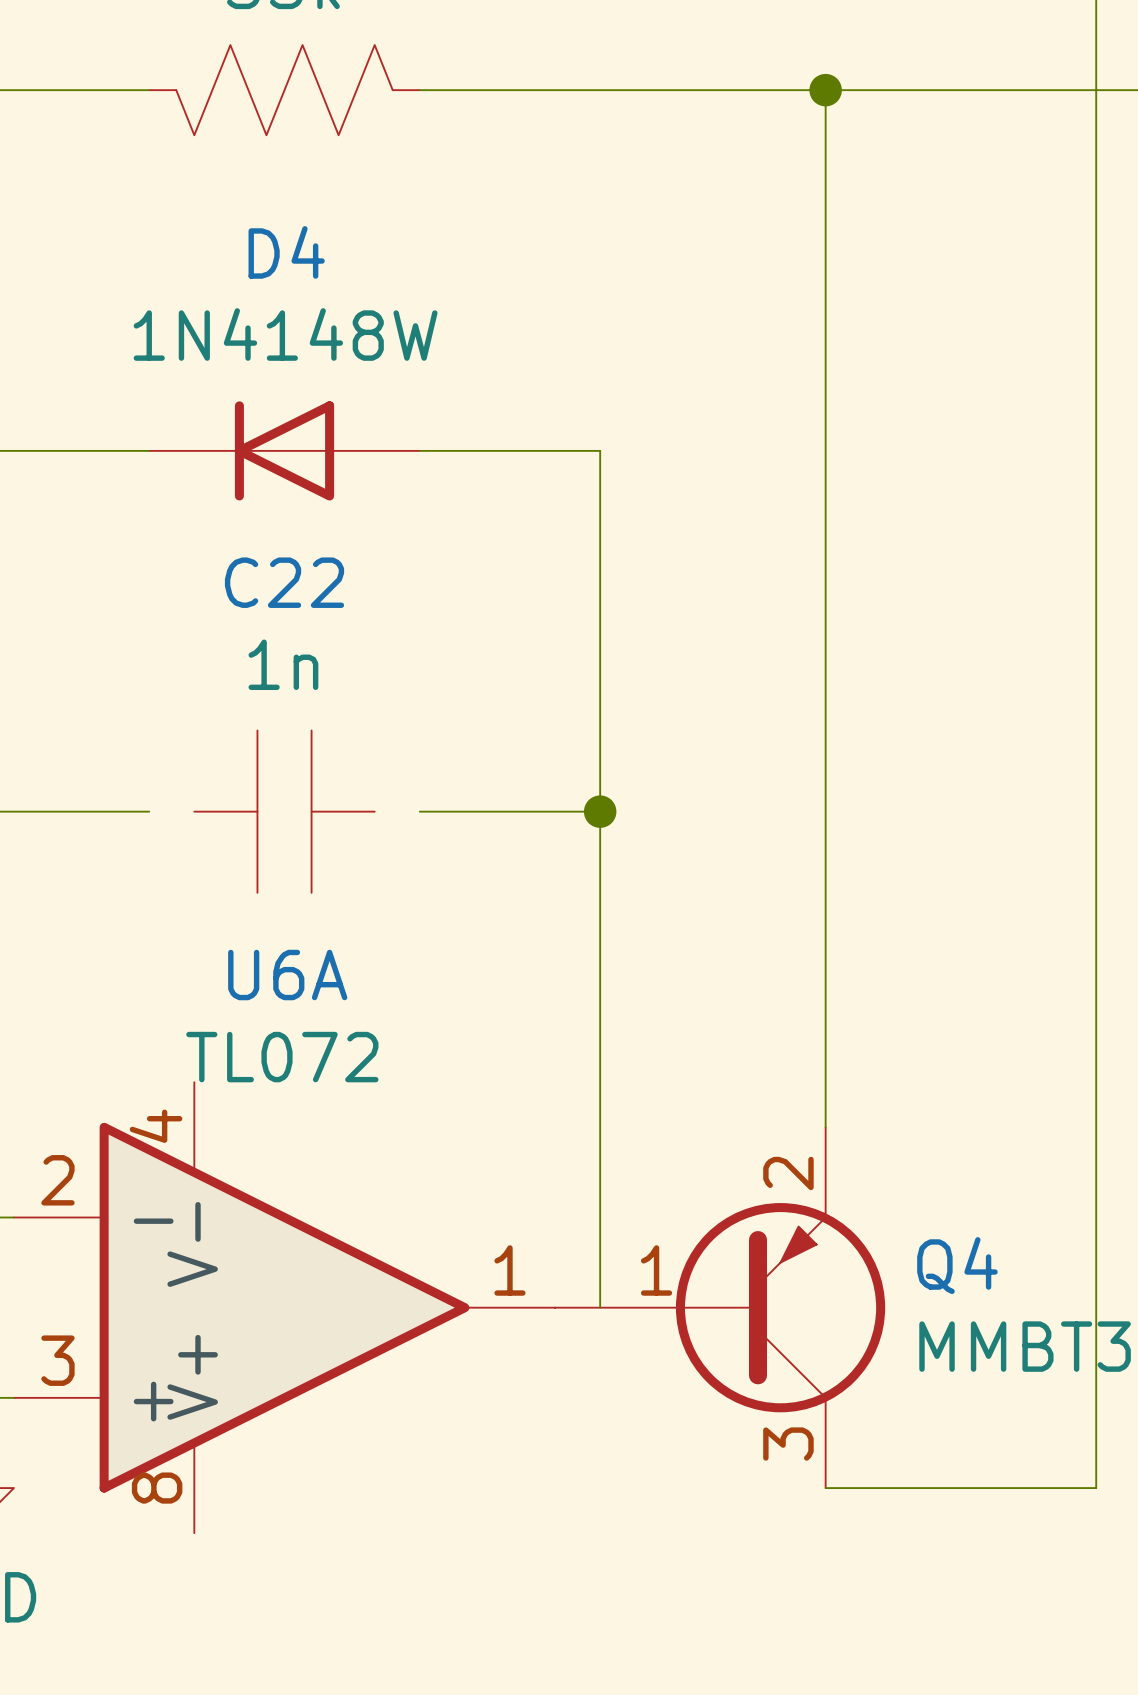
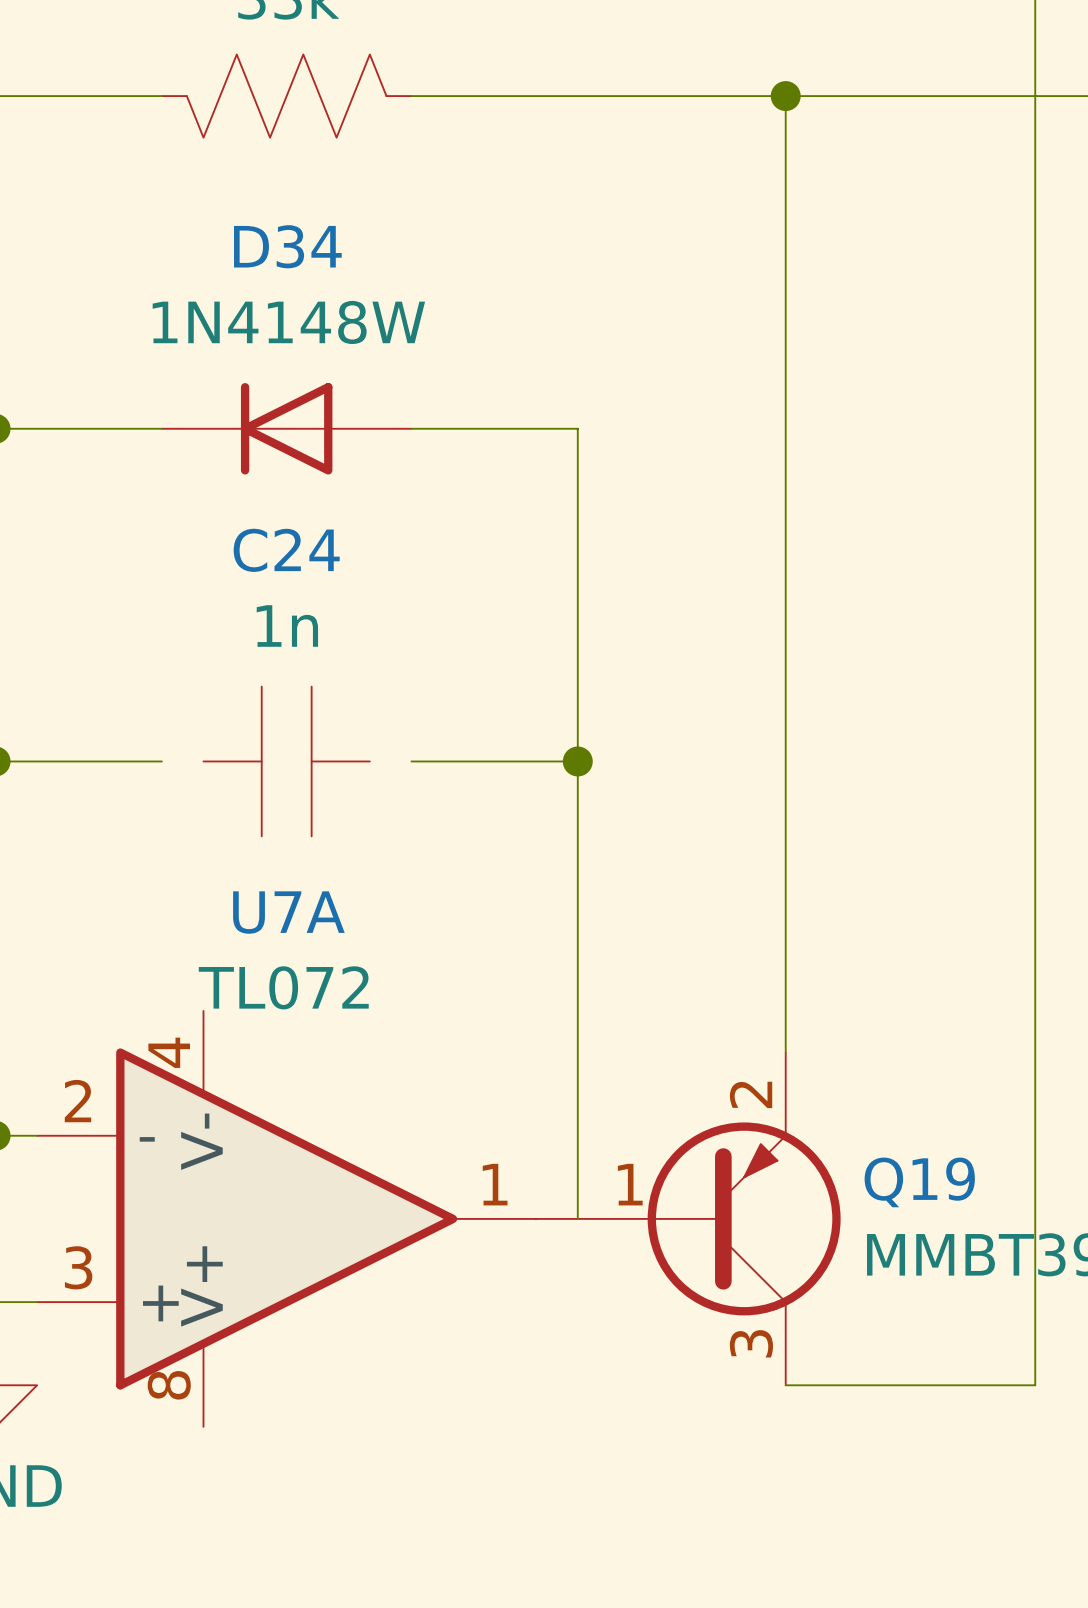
D4 name: D4 (286, 252) -> D34 (287, 246)
C22 name: C22 (284, 582) -> C24 (286, 550)
U6A name: U6A (287, 975) -> U7A (288, 912)
Q4 name: Q4 (957, 1265) -> Q19 (919, 1182)

